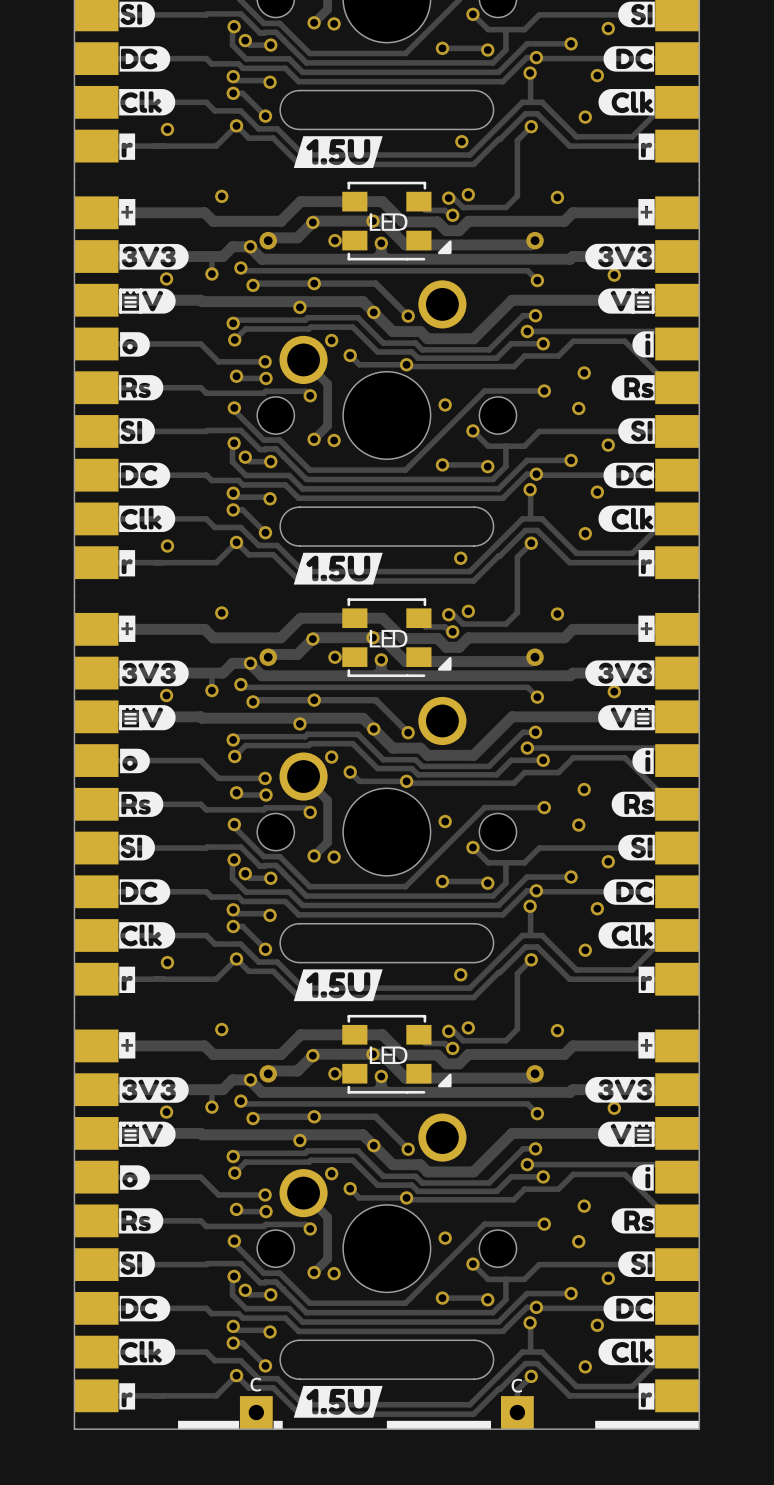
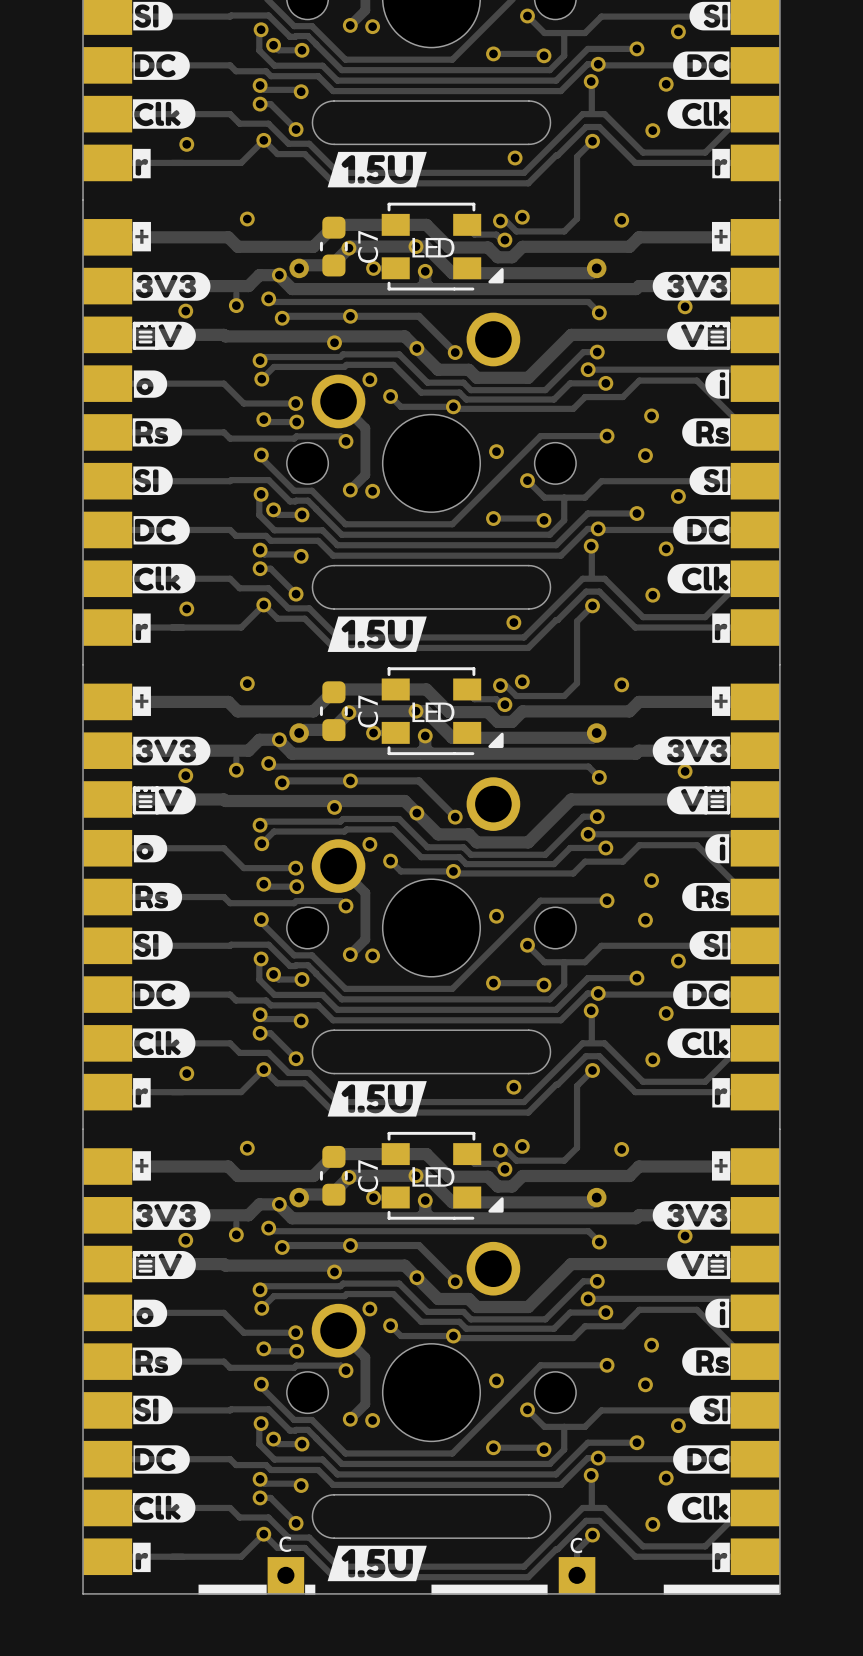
C7: none -> (333, 246)
C7: none -> (333, 711)
C7: none -> (333, 1175)

